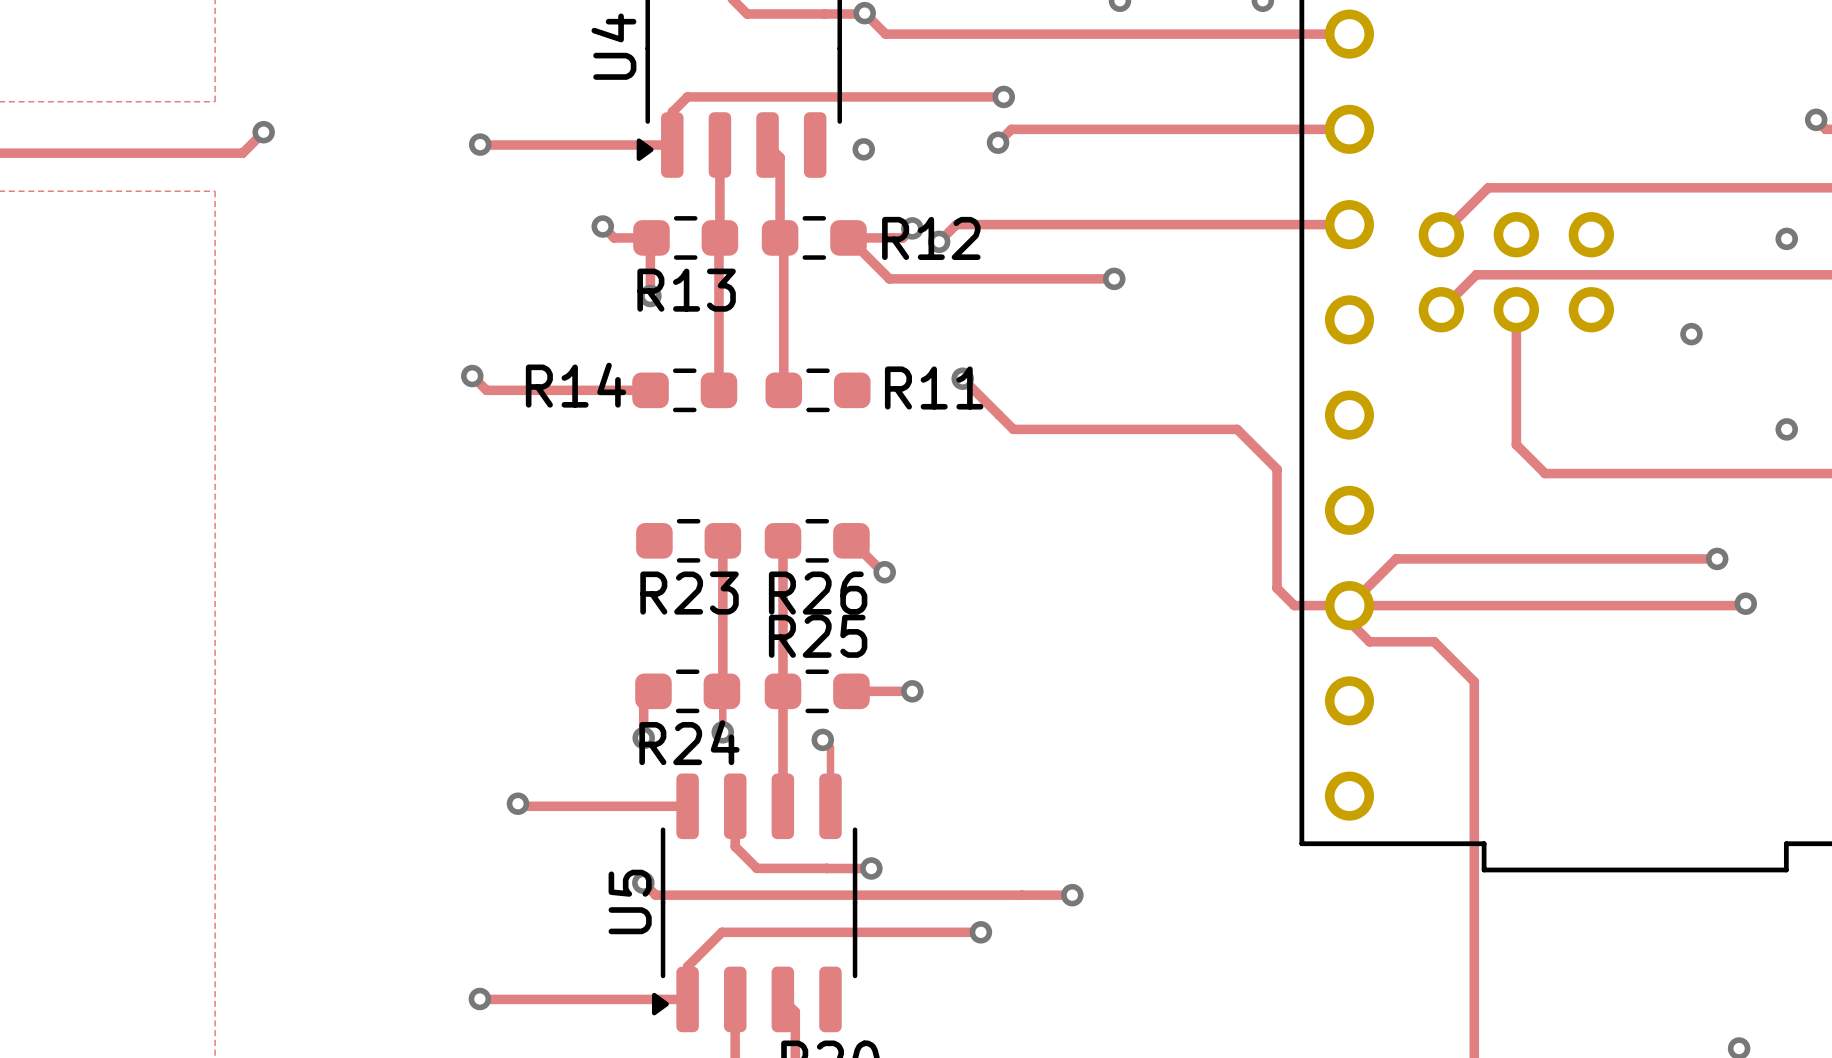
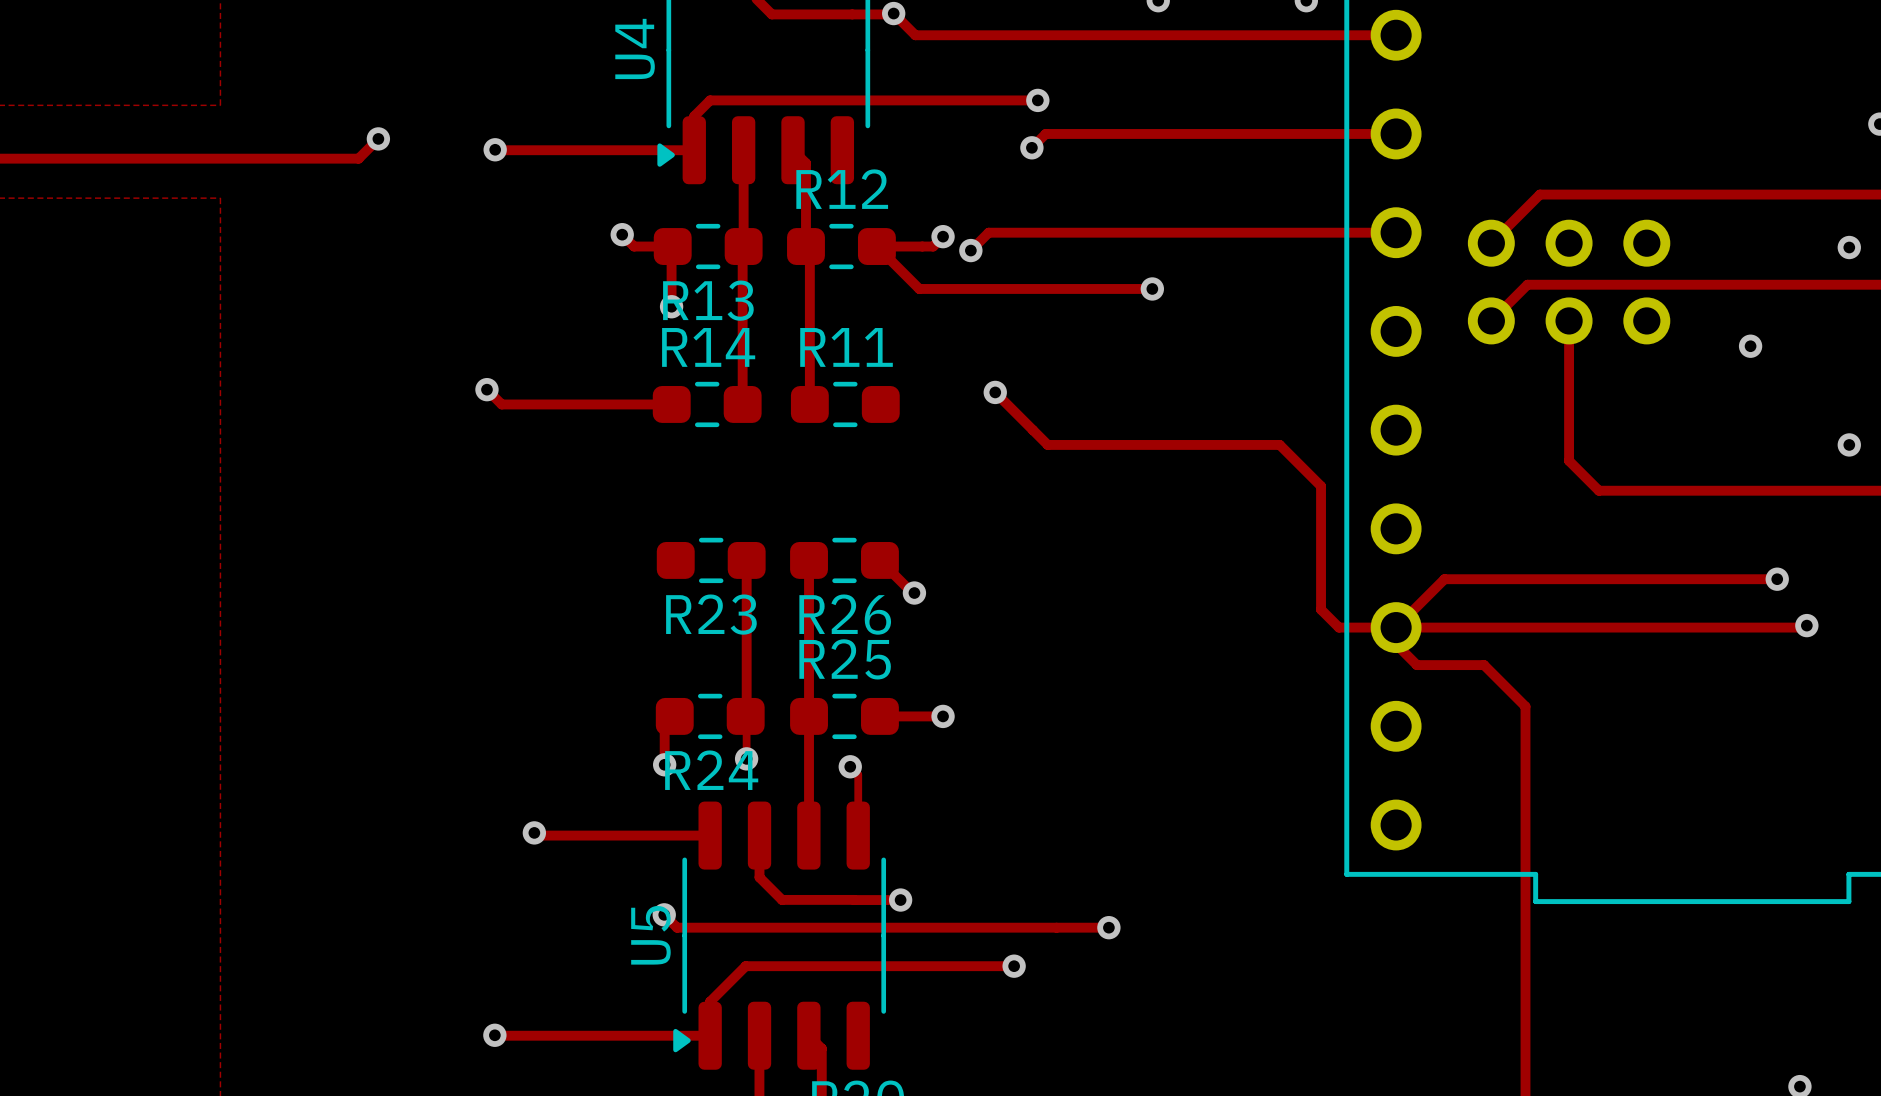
track: (263, 132) (242, 153) -> (378, 138) (358, 158) (249, 158)
via position: (263, 132) -> (378, 138)
via: (863, 149) -> none
R12 name position: R12 (931, 238) -> R12 (842, 189)
R14 name position: R14 (575, 385) -> R14 (708, 347)
R11 name position: R11 (934, 387) -> R11 (846, 347)

